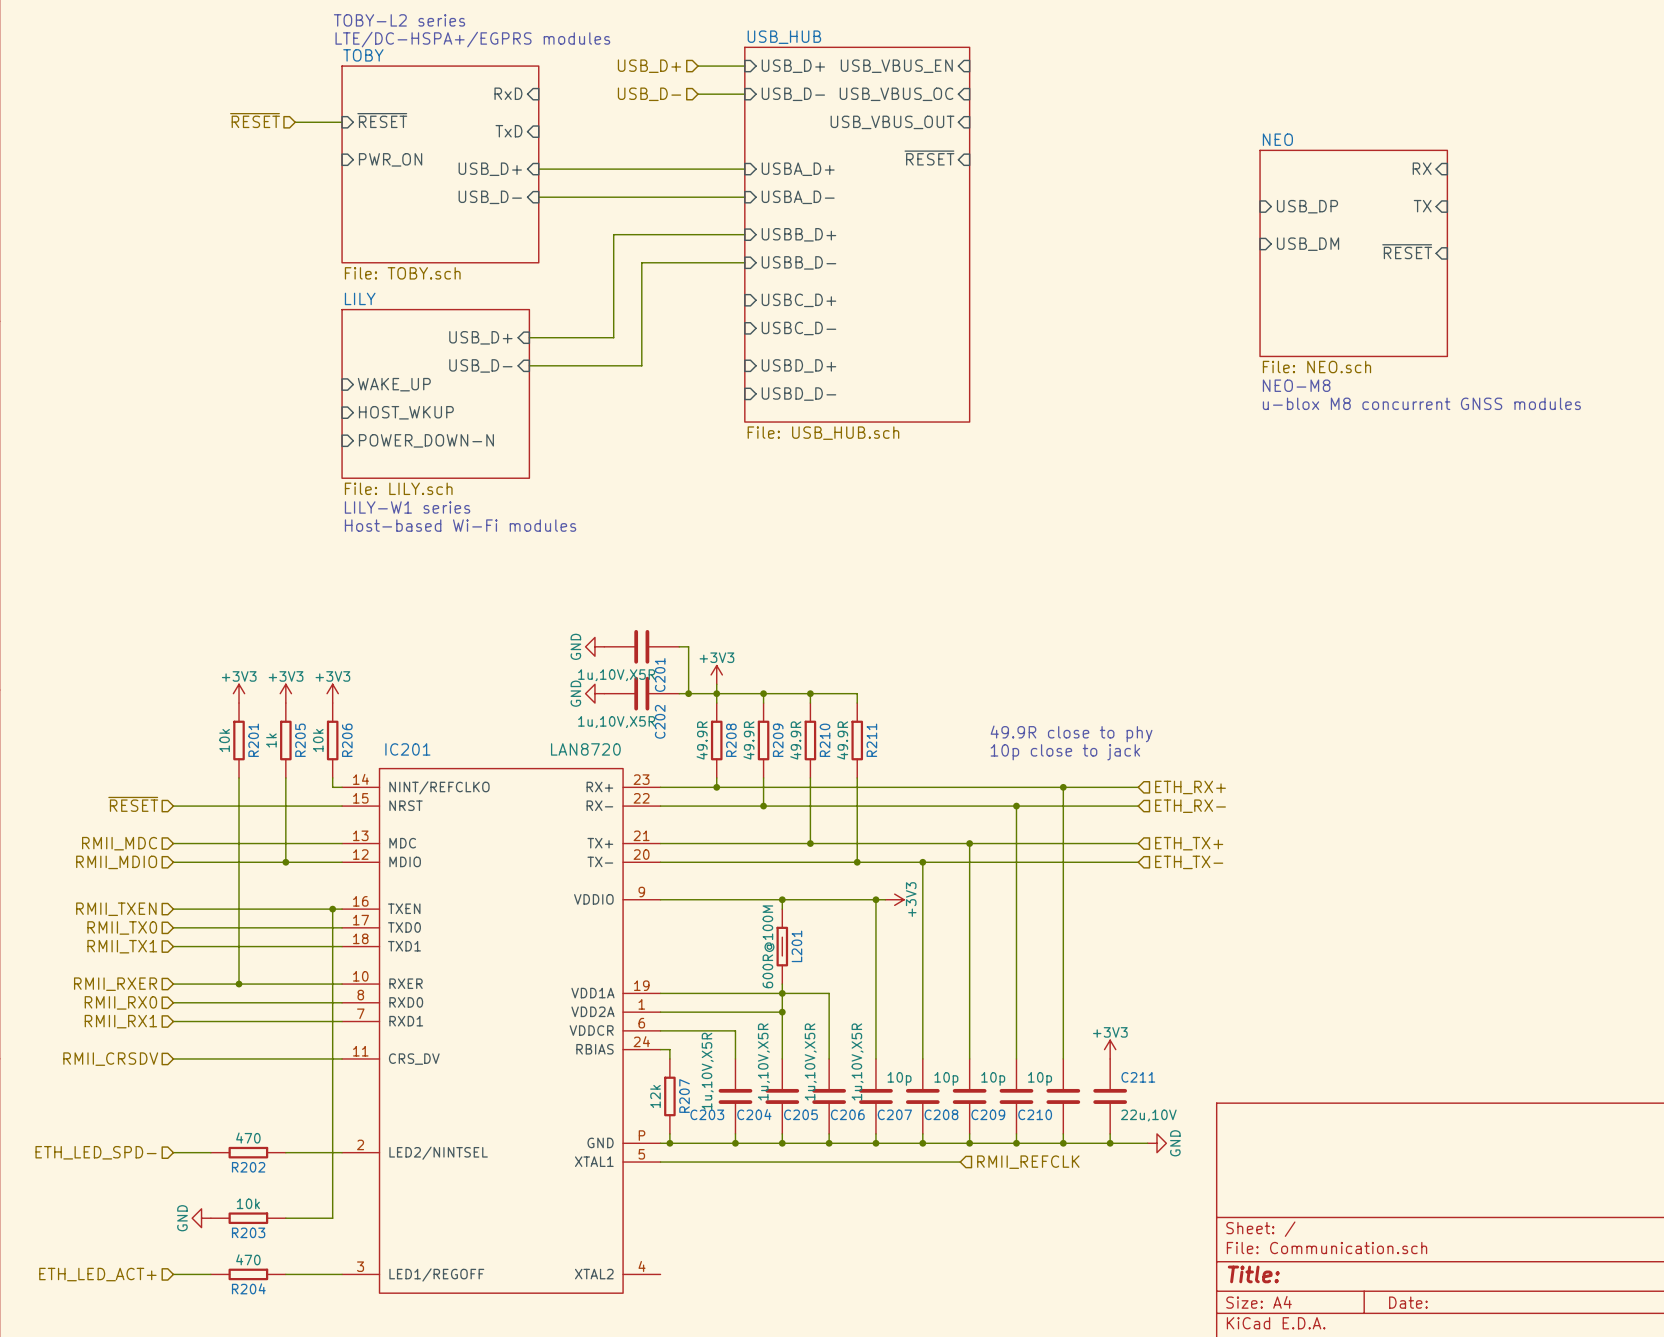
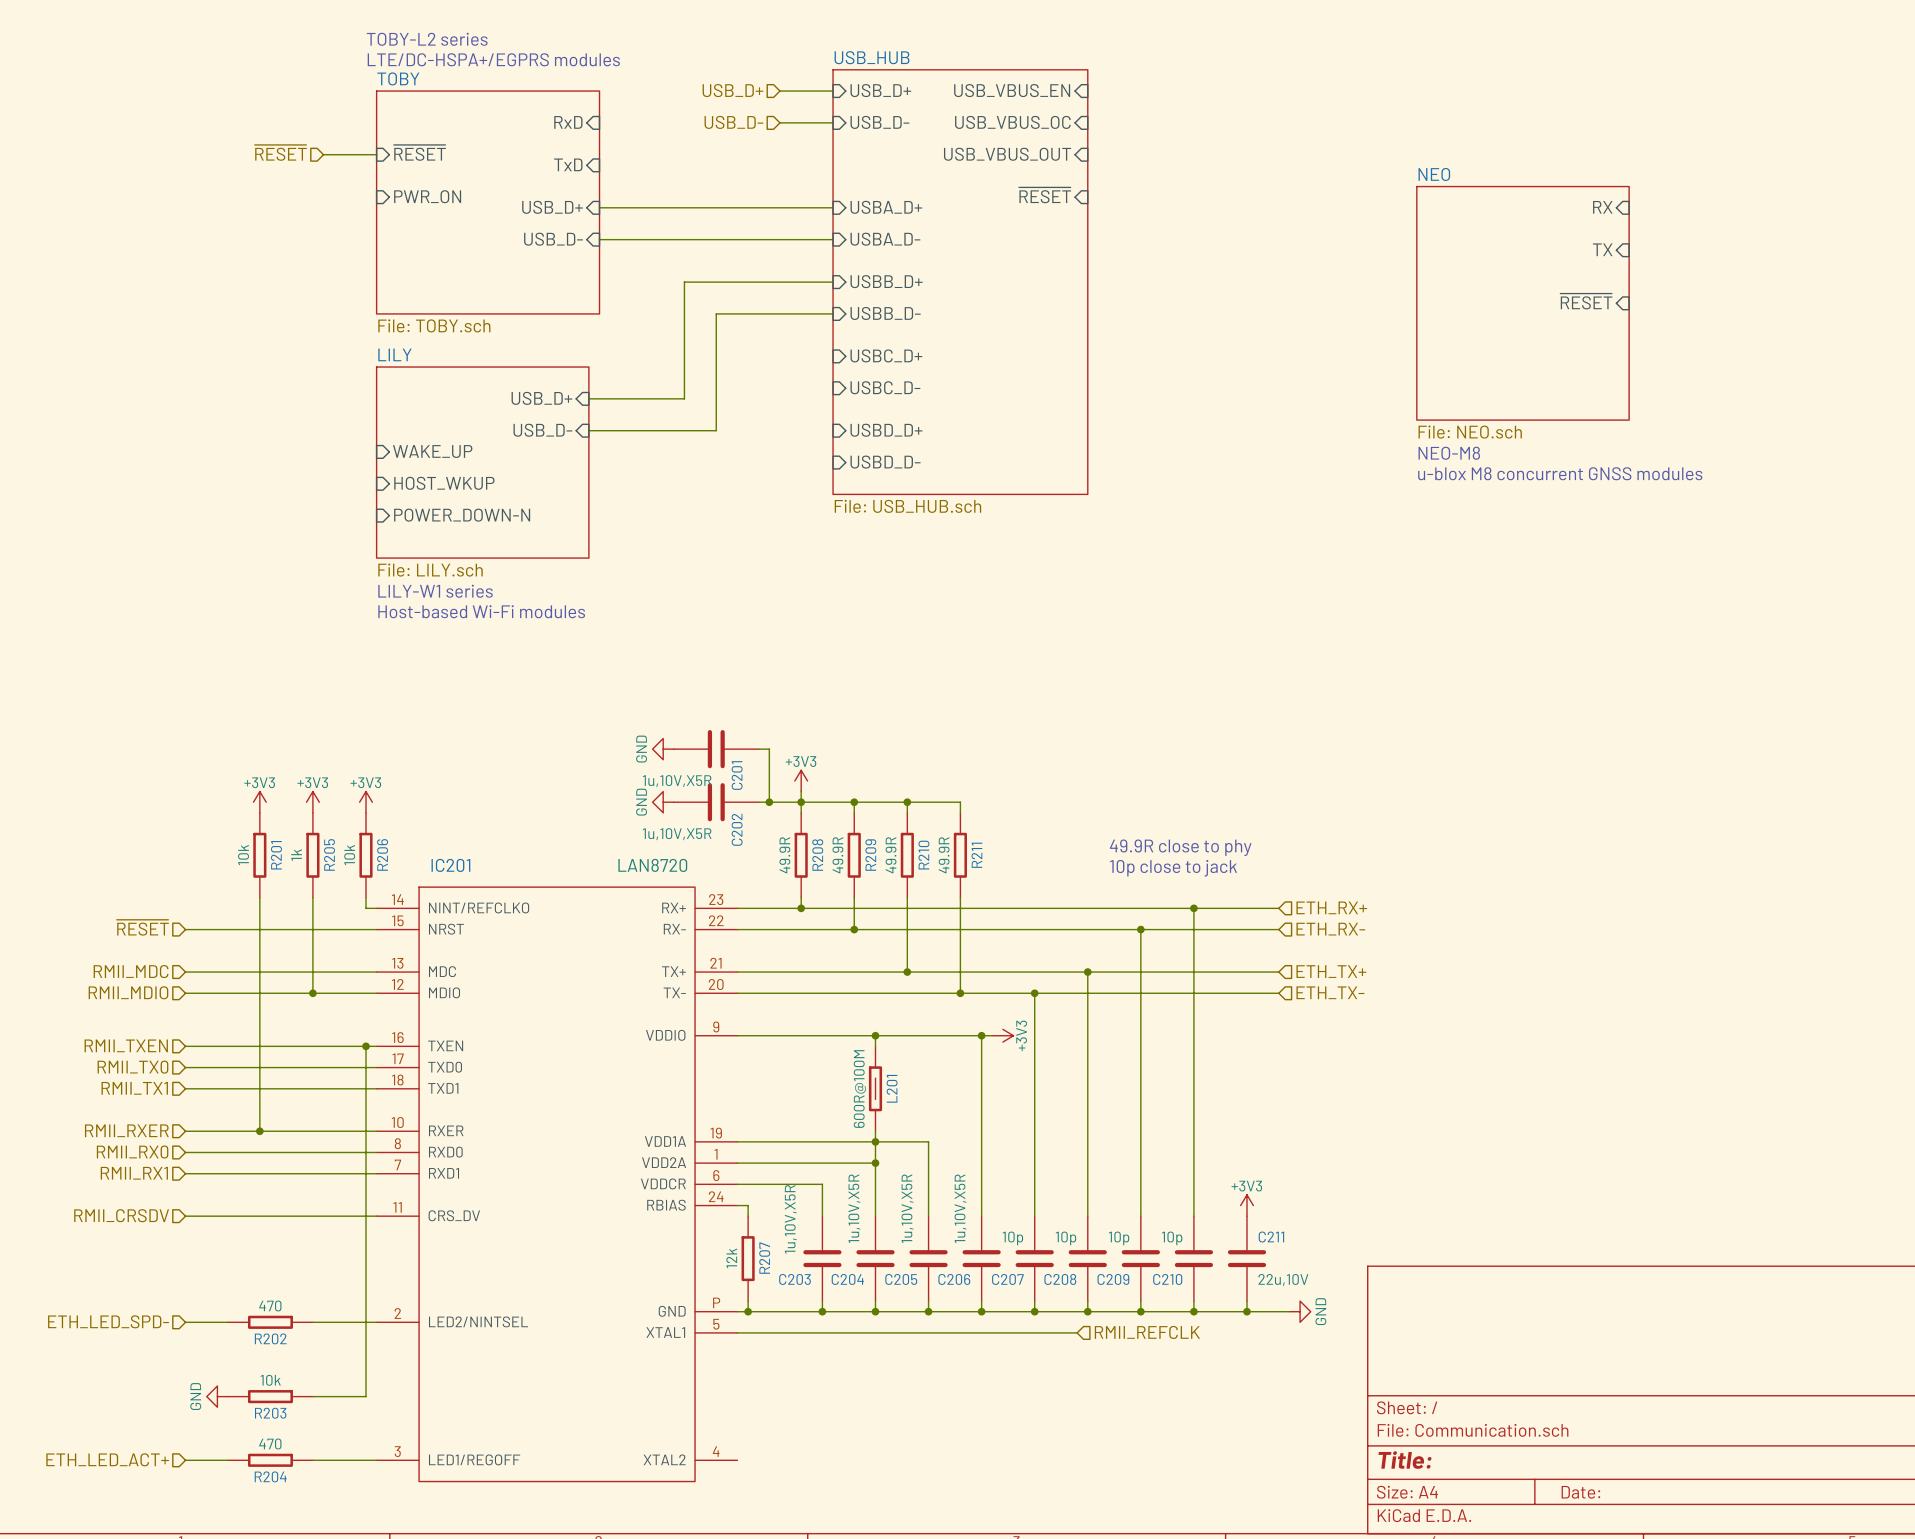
sheet pin: USB_DP (1307, 206) -> none
sheet pin: USB_DM (1308, 244) -> none

